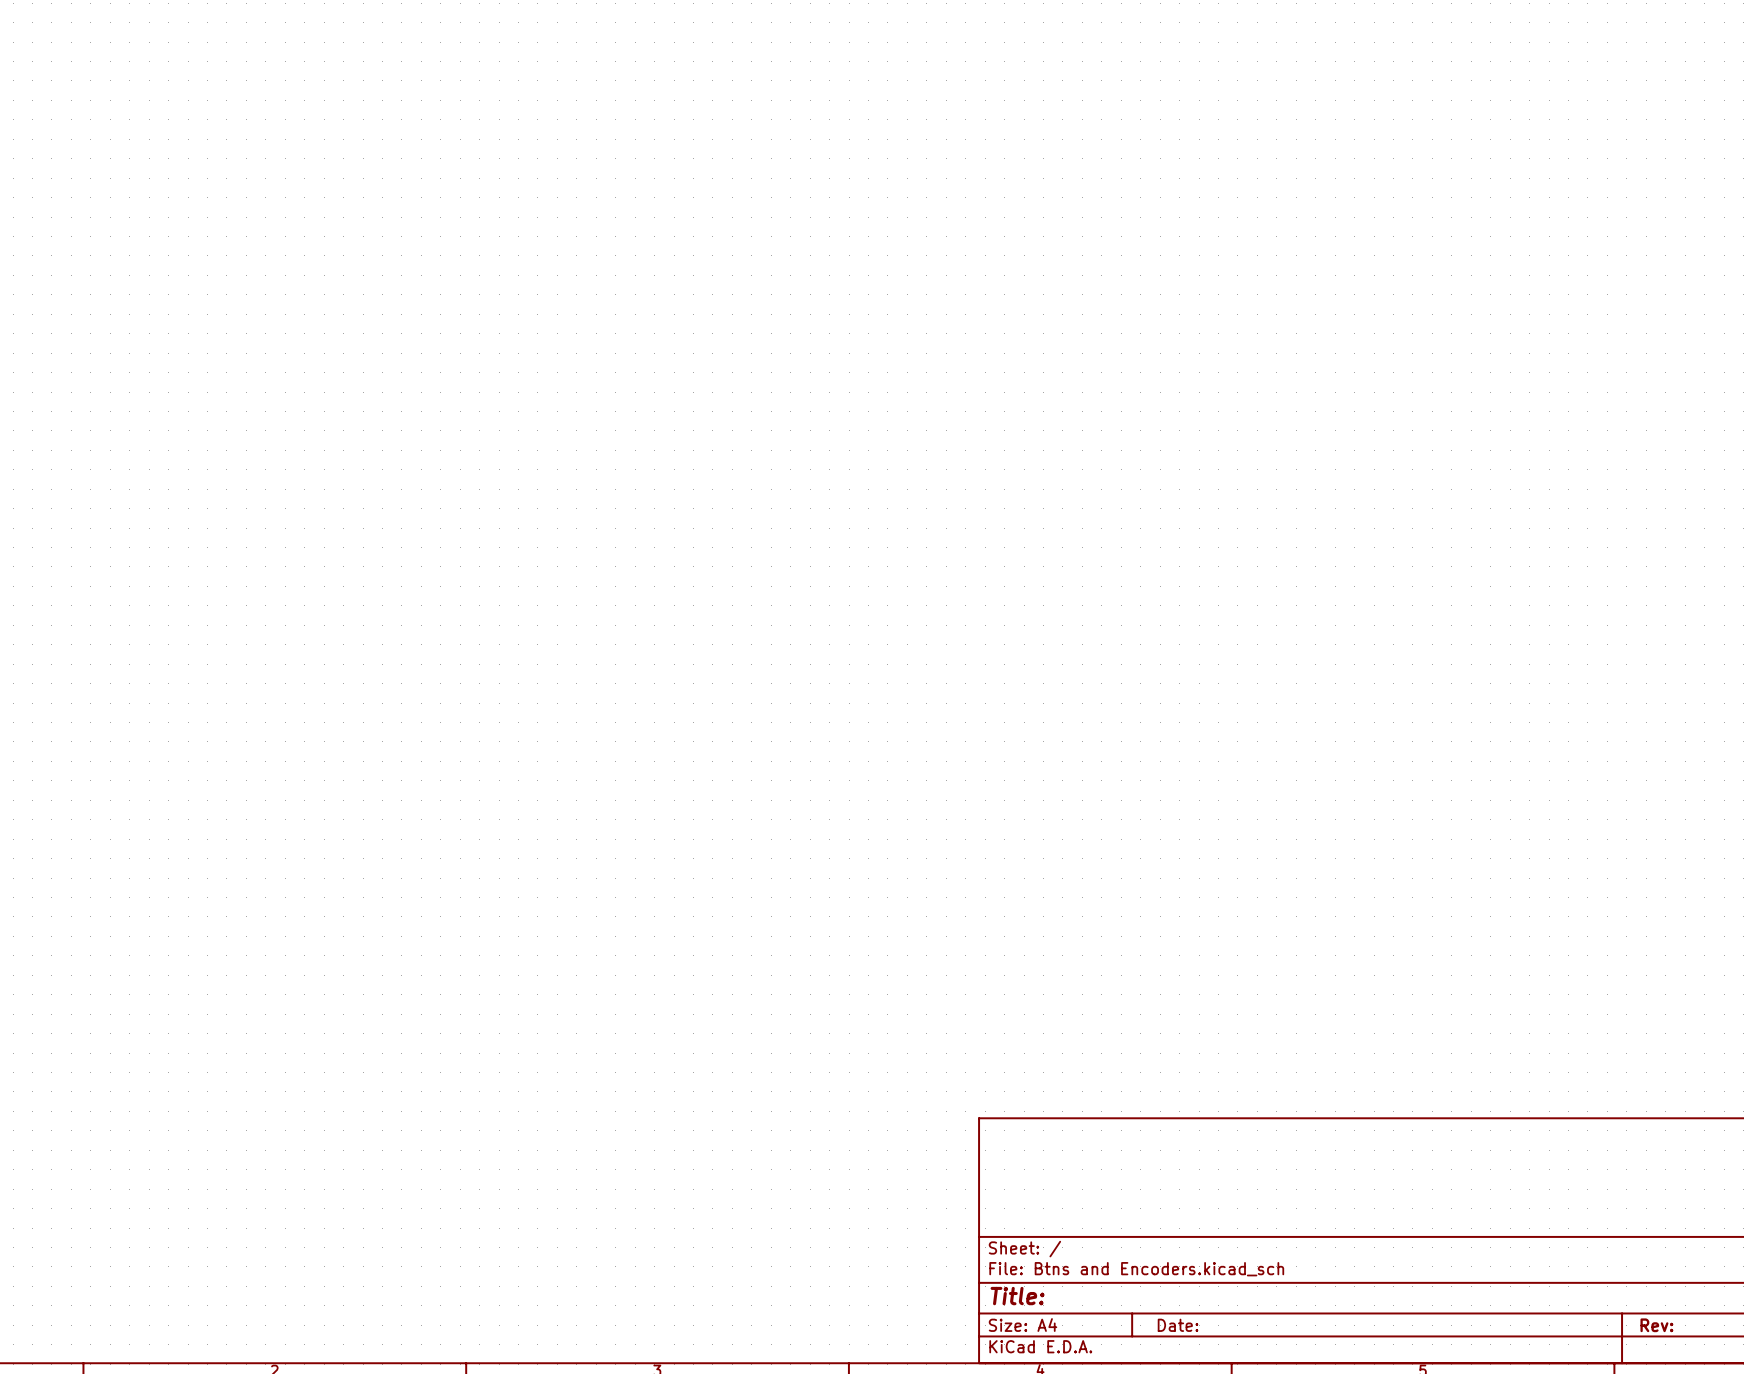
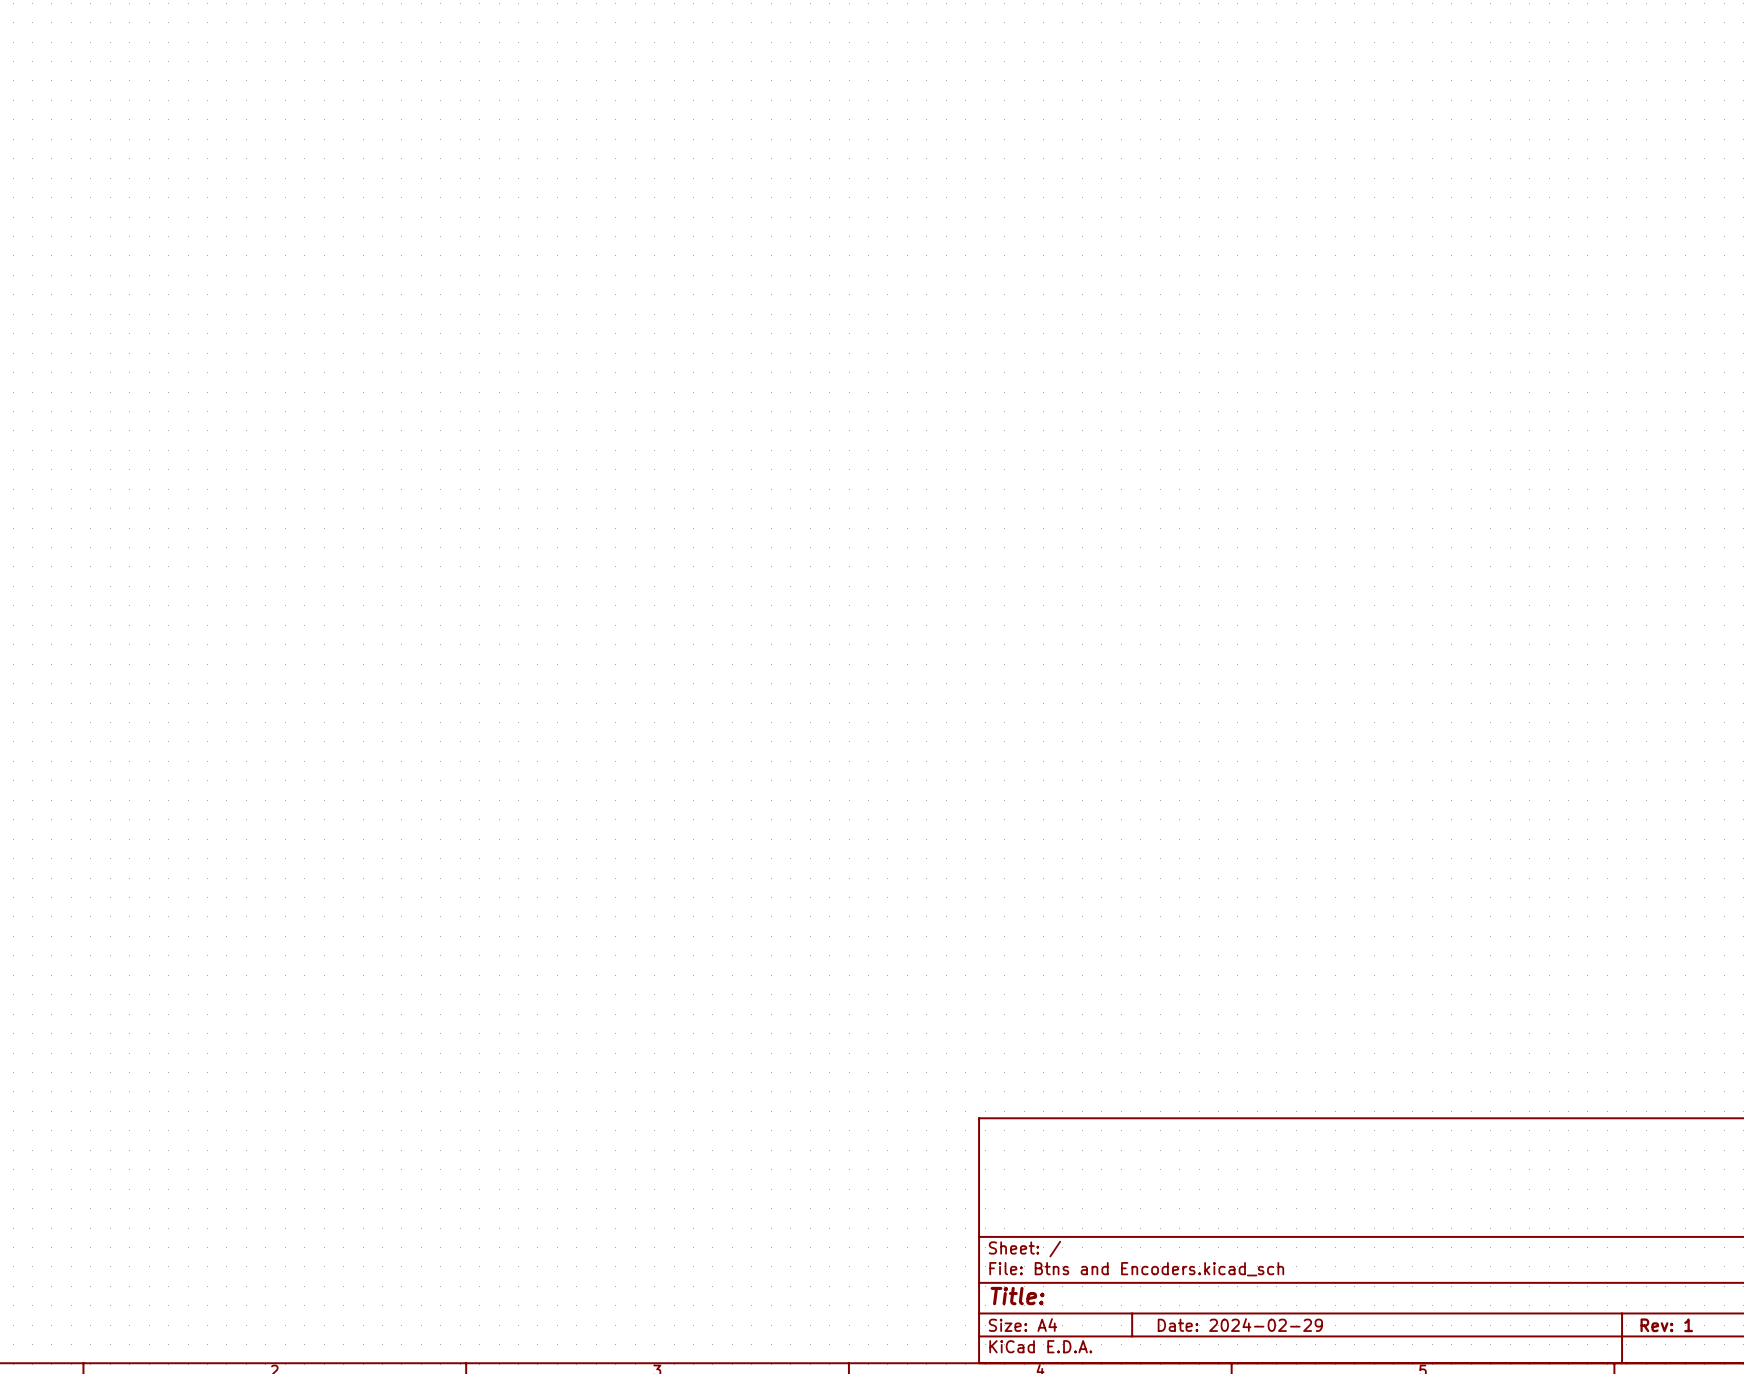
title block: Date: (1178, 1325) -> Date: 2024-02-29 (1240, 1325)
title block: Rev: (1656, 1325) -> Rev: 1 (1666, 1325)

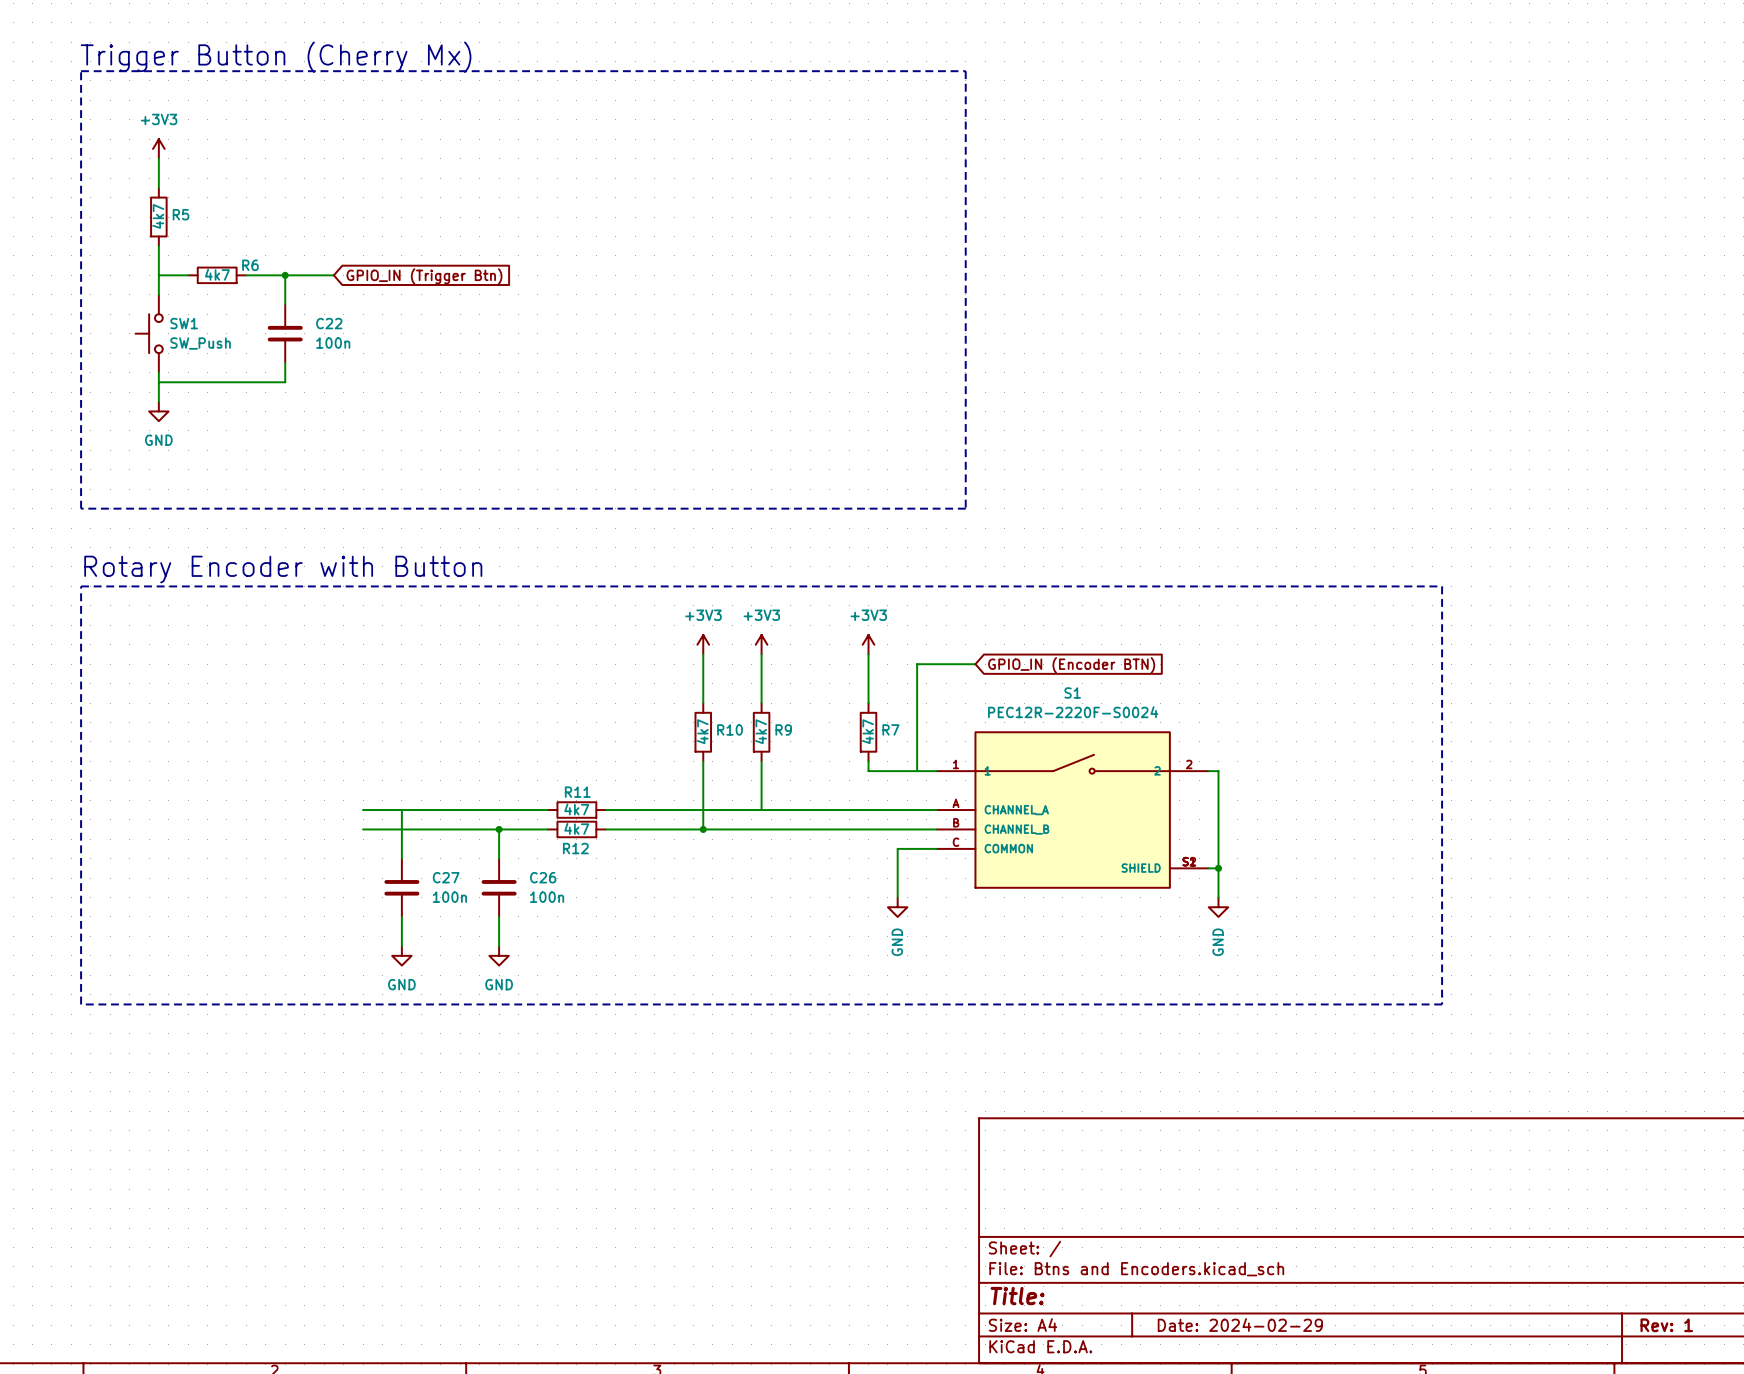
text: none -> Trigger Button (Cherry Mx) (276, 57)
line: none -> (81, 71) (965, 71) (965, 508) (81, 508) (81, 71)
power symbol: none -> +3V3 (158, 148)
wire: none -> (158, 158) (158, 187)
R5: none -> 4k7 (158, 217)
wire: none -> (158, 246) (158, 294)
wire: none -> (158, 275) (188, 275)
R6: none -> 4k7 (217, 275)
wire: none -> (246, 275) (333, 275)
wire: none -> (285, 275) (285, 304)
junction: none -> (285, 275)
global label: none -> GPIO_IN (Trigger Btn) (424, 276)
SW1: none -> SW_Push (149, 333)
C22: none -> 100n (285, 333)
wire: none -> (285, 362) (285, 382) (158, 382)
wire: none -> (158, 372) (158, 401)
power symbol: none -> GND (158, 411)
text: none -> Rotary Encoder with Button (283, 569)
line: none -> (81, 586) (81, 1004) (1442, 1004) (1442, 586) (81, 586)
power symbol: none -> +3V3 (703, 644)
power symbol: none -> +3V3 (761, 644)
power symbol: none -> +3V3 (868, 644)
wire: none -> (703, 654) (703, 703)
wire: none -> (761, 654) (761, 703)
wire: none -> (868, 654) (868, 703)
wire: none -> (975, 664) (917, 664) (917, 771)
global label: none -> GPIO_IN (Encoder BTN) (1071, 665)
R10: none -> 4k7 (703, 732)
R9: none -> 4k7 (761, 732)
R7: none -> 4k7 (868, 732)
wire: none -> (703, 761) (703, 829)
wire: none -> (761, 761) (761, 810)
wire: none -> (868, 761) (868, 771) (936, 771)
wire: none -> (1208, 771) (1218, 771) (1218, 897)
wire: none -> (363, 810) (547, 810)
wire: none -> (401, 810) (401, 858)
R11: none -> 4k7 (576, 810)
wire: none -> (606, 810) (936, 810)
S1: none -> PEC12R-2220F-S0024 (1072, 810)
wire: none -> (363, 829) (547, 829)
wire: none -> (499, 829) (499, 858)
junction: none -> (499, 829)
R12: none -> 4k7 (576, 829)
wire: none -> (606, 829) (936, 829)
junction: none -> (703, 829)
wire: none -> (936, 848) (897, 848) (897, 897)
wire: none -> (1208, 868) (1218, 868)
junction: none -> (1218, 868)
C27: none -> 100n (401, 887)
C26: none -> 100n (499, 887)
power symbol: none -> GND (897, 907)
power symbol: none -> GND (1218, 907)
wire: none -> (401, 916) (401, 946)
wire: none -> (499, 916) (499, 946)
power symbol: none -> GND (401, 955)
power symbol: none -> GND (499, 955)

